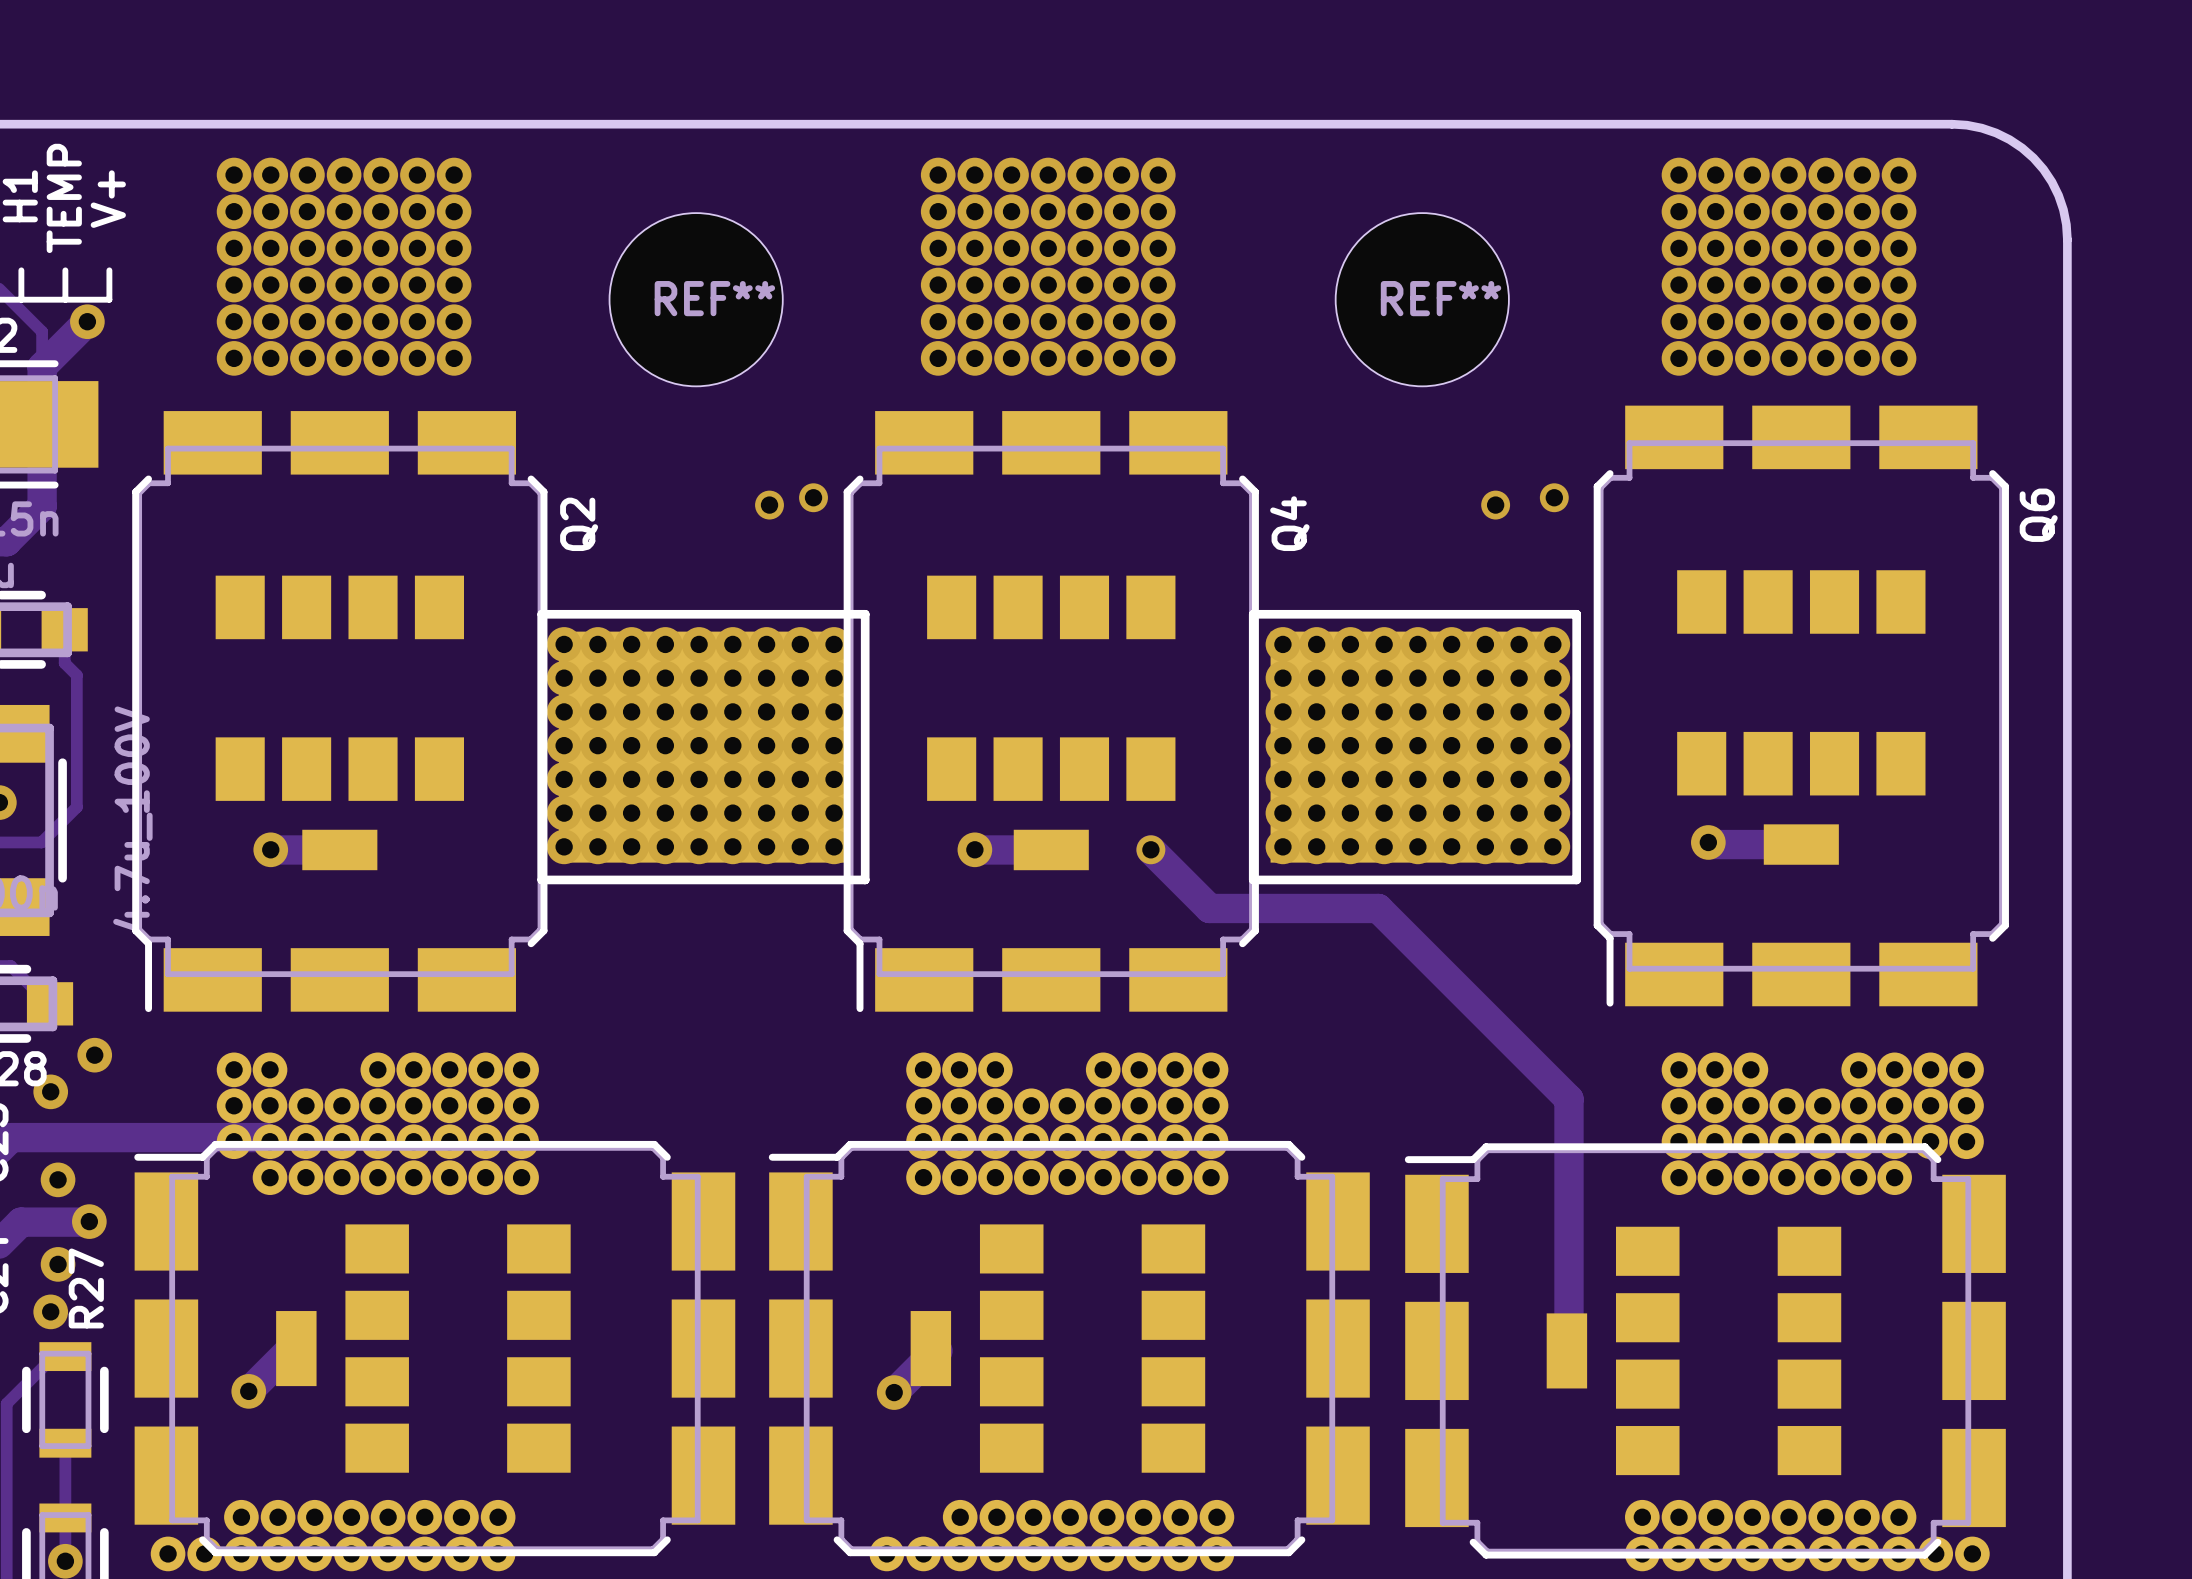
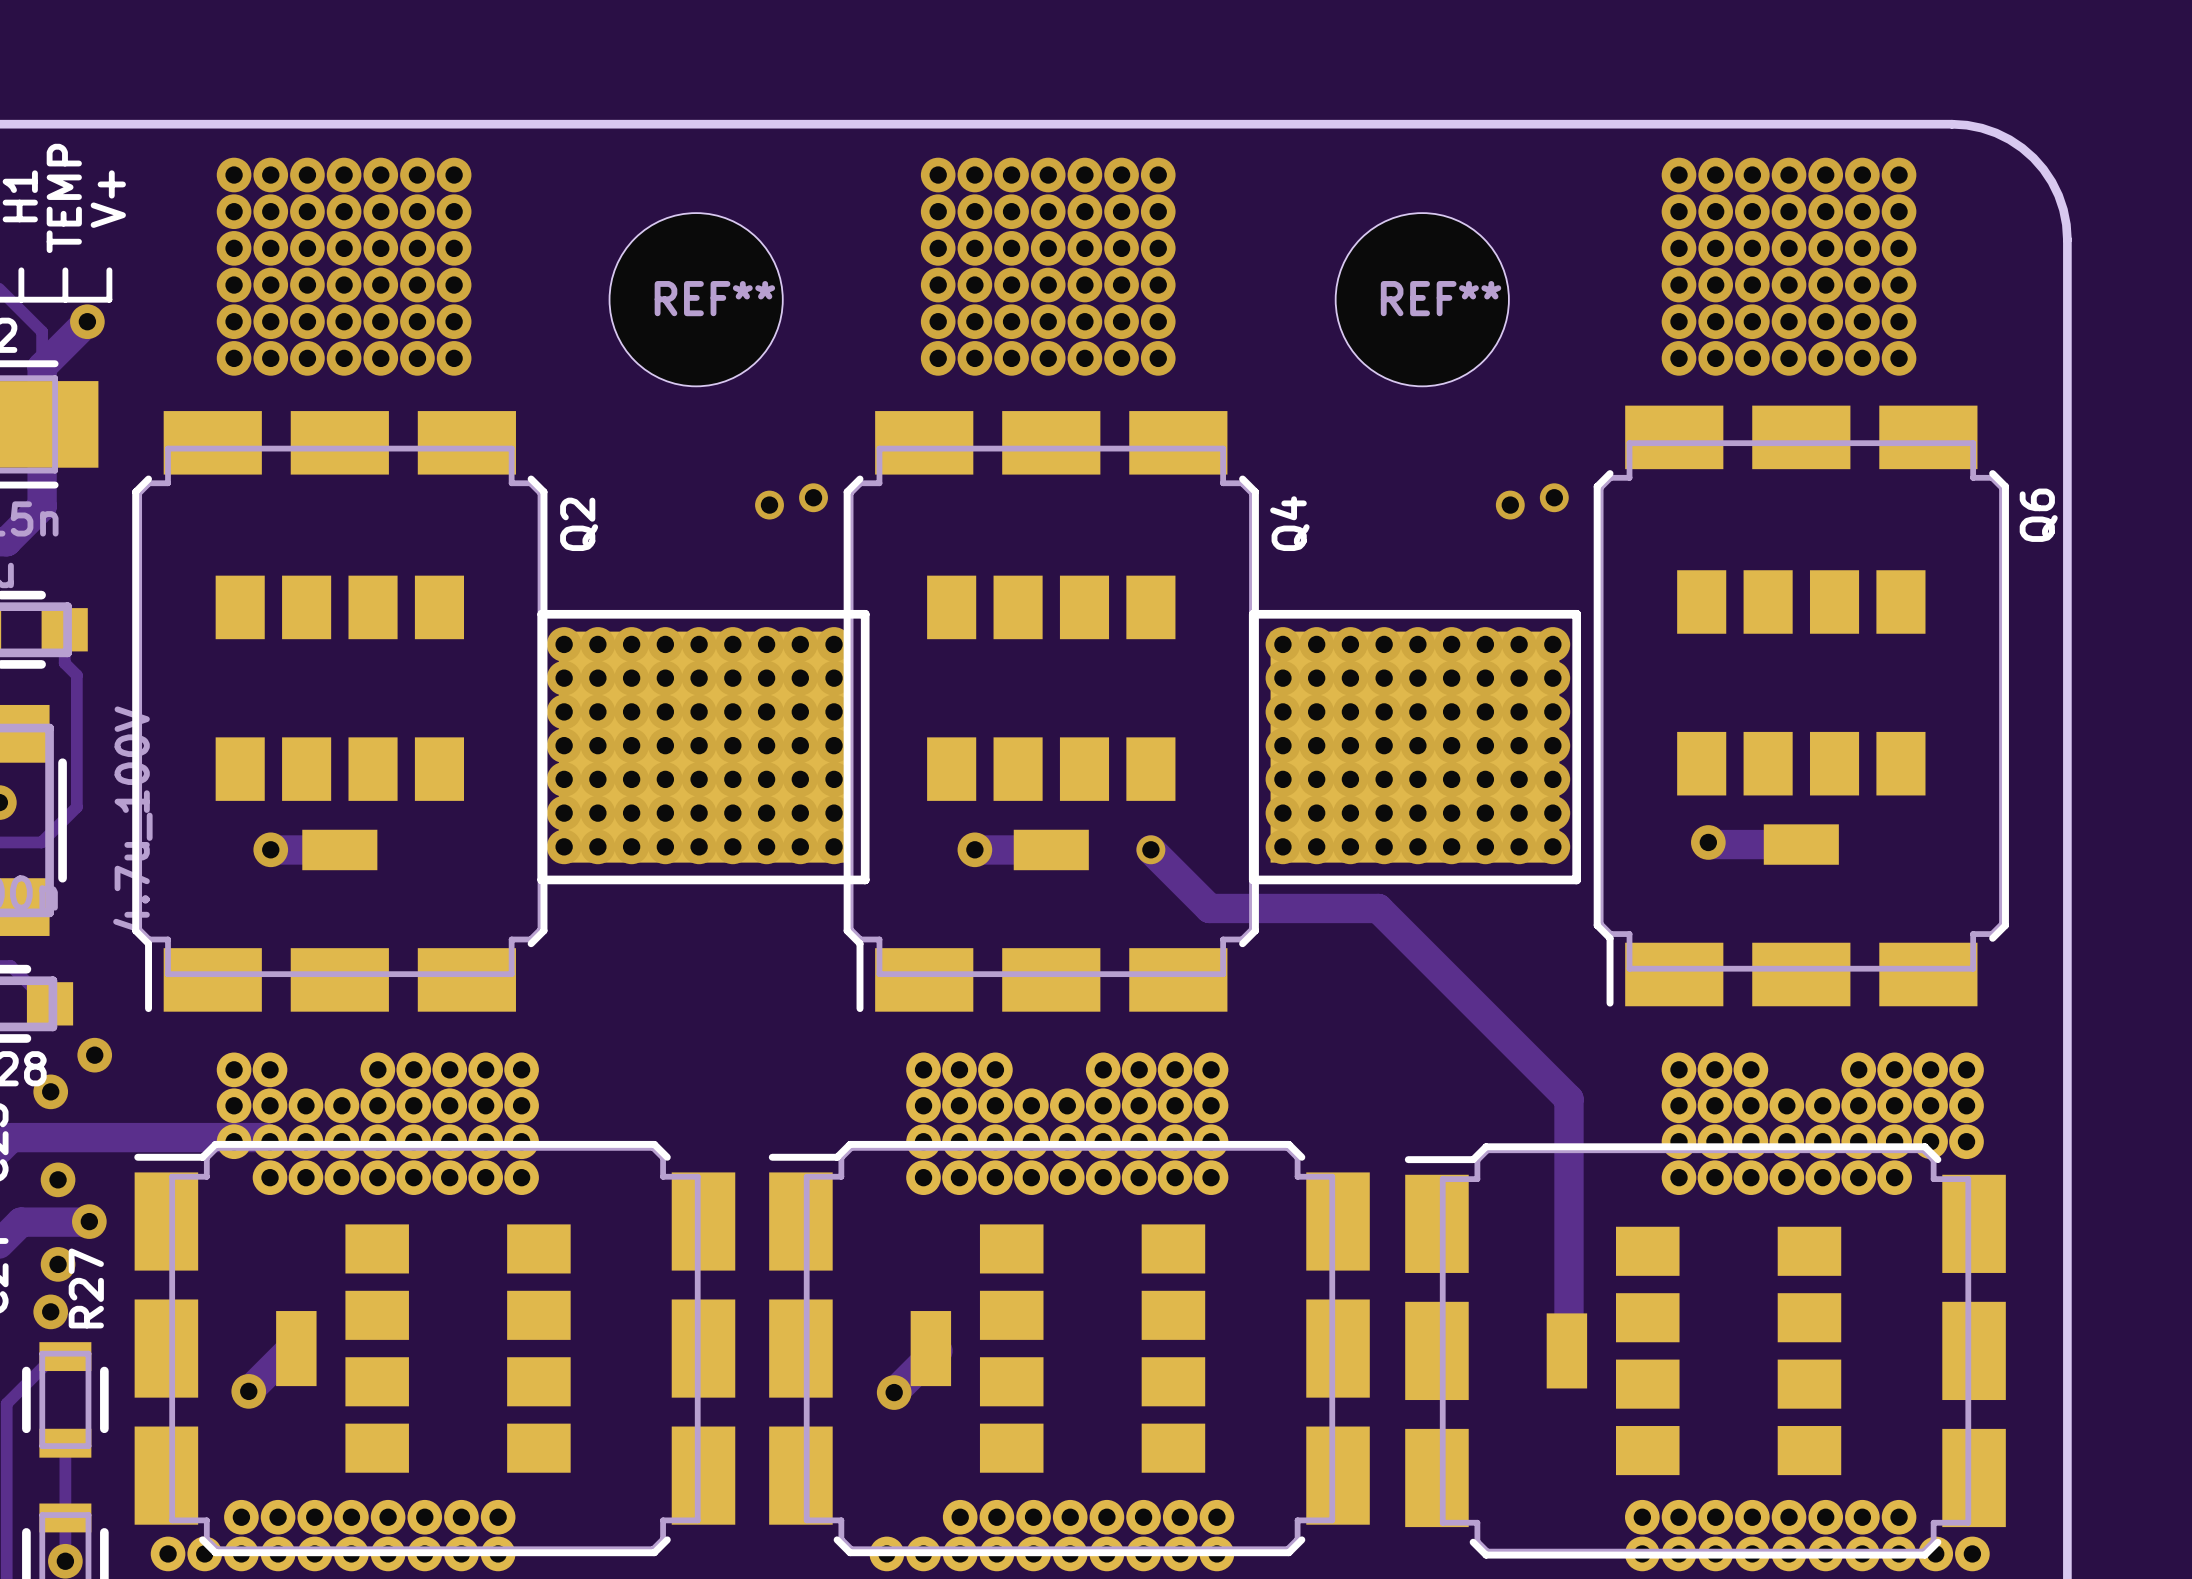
via position: (1495, 505) -> (1510, 505)

